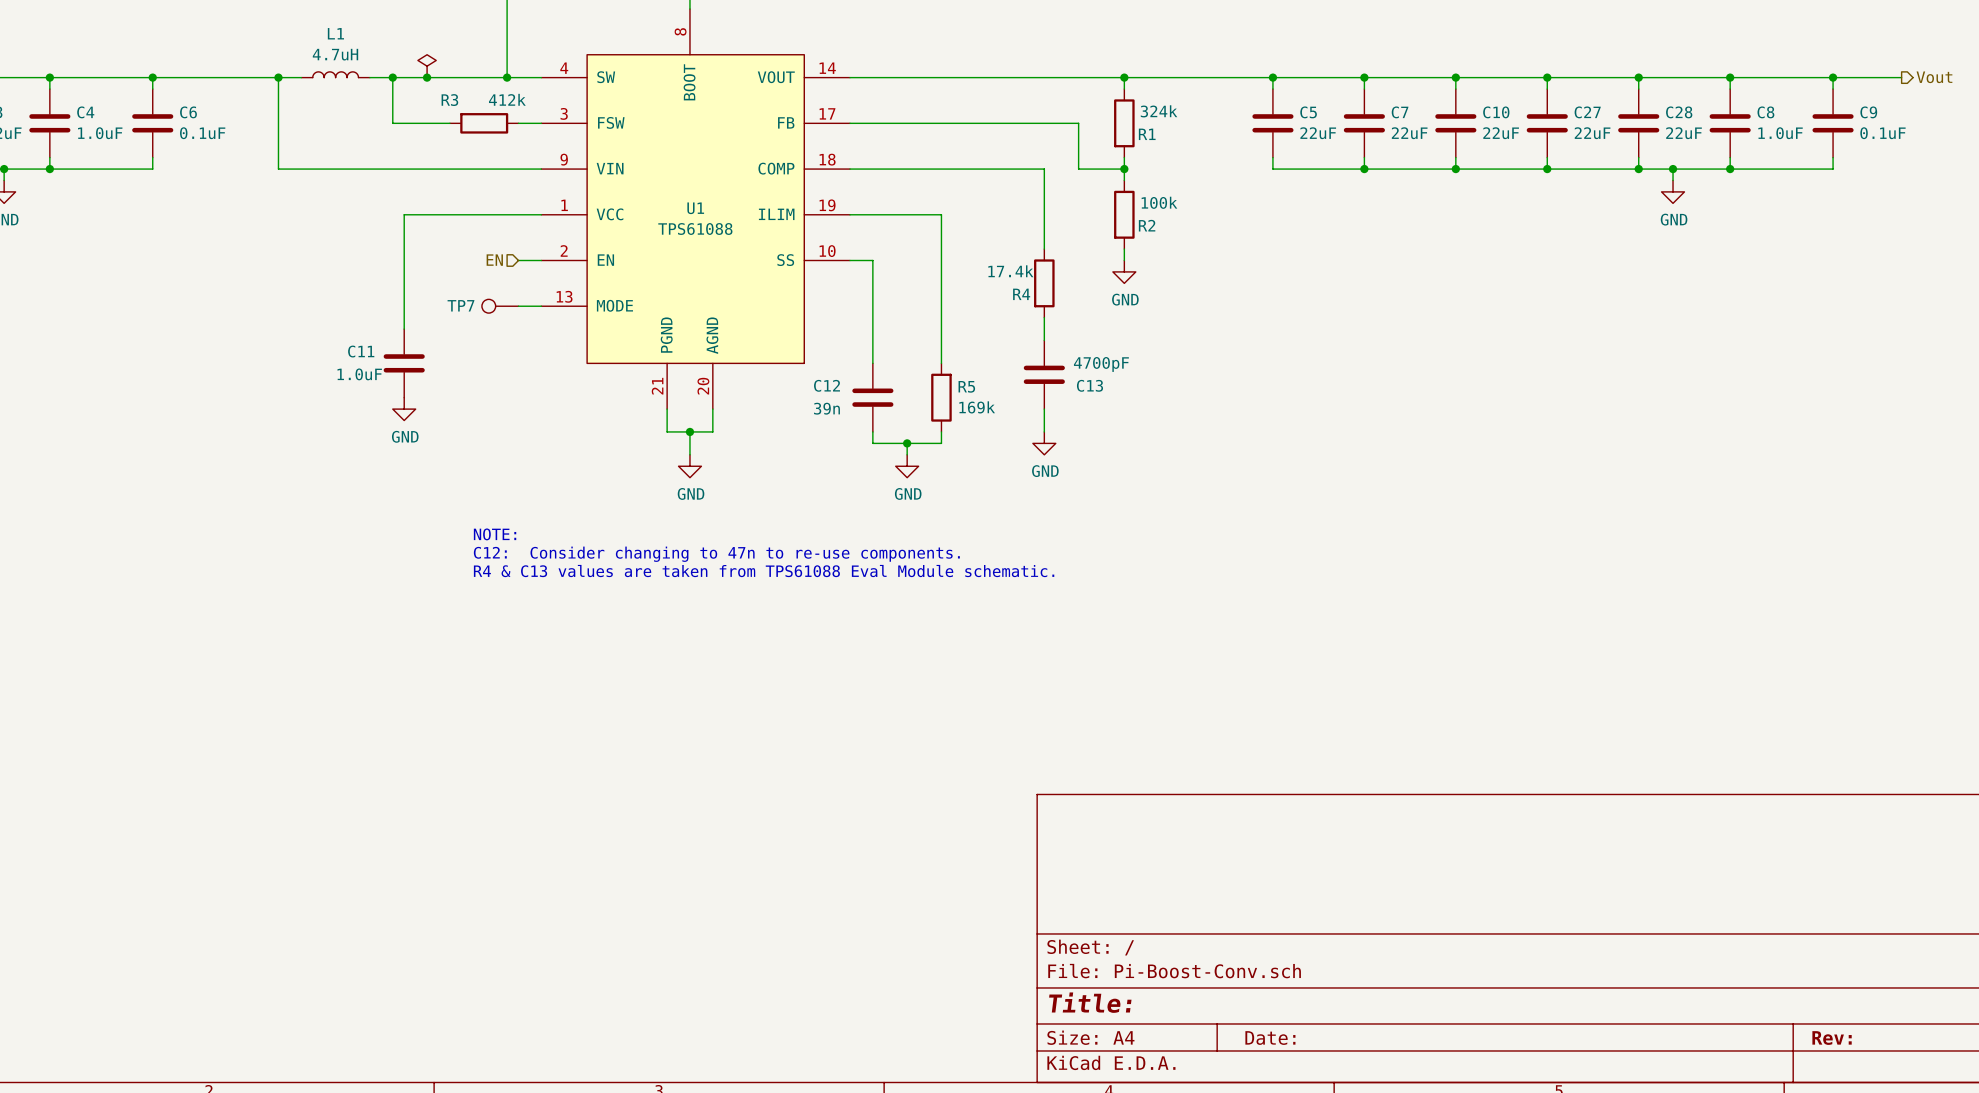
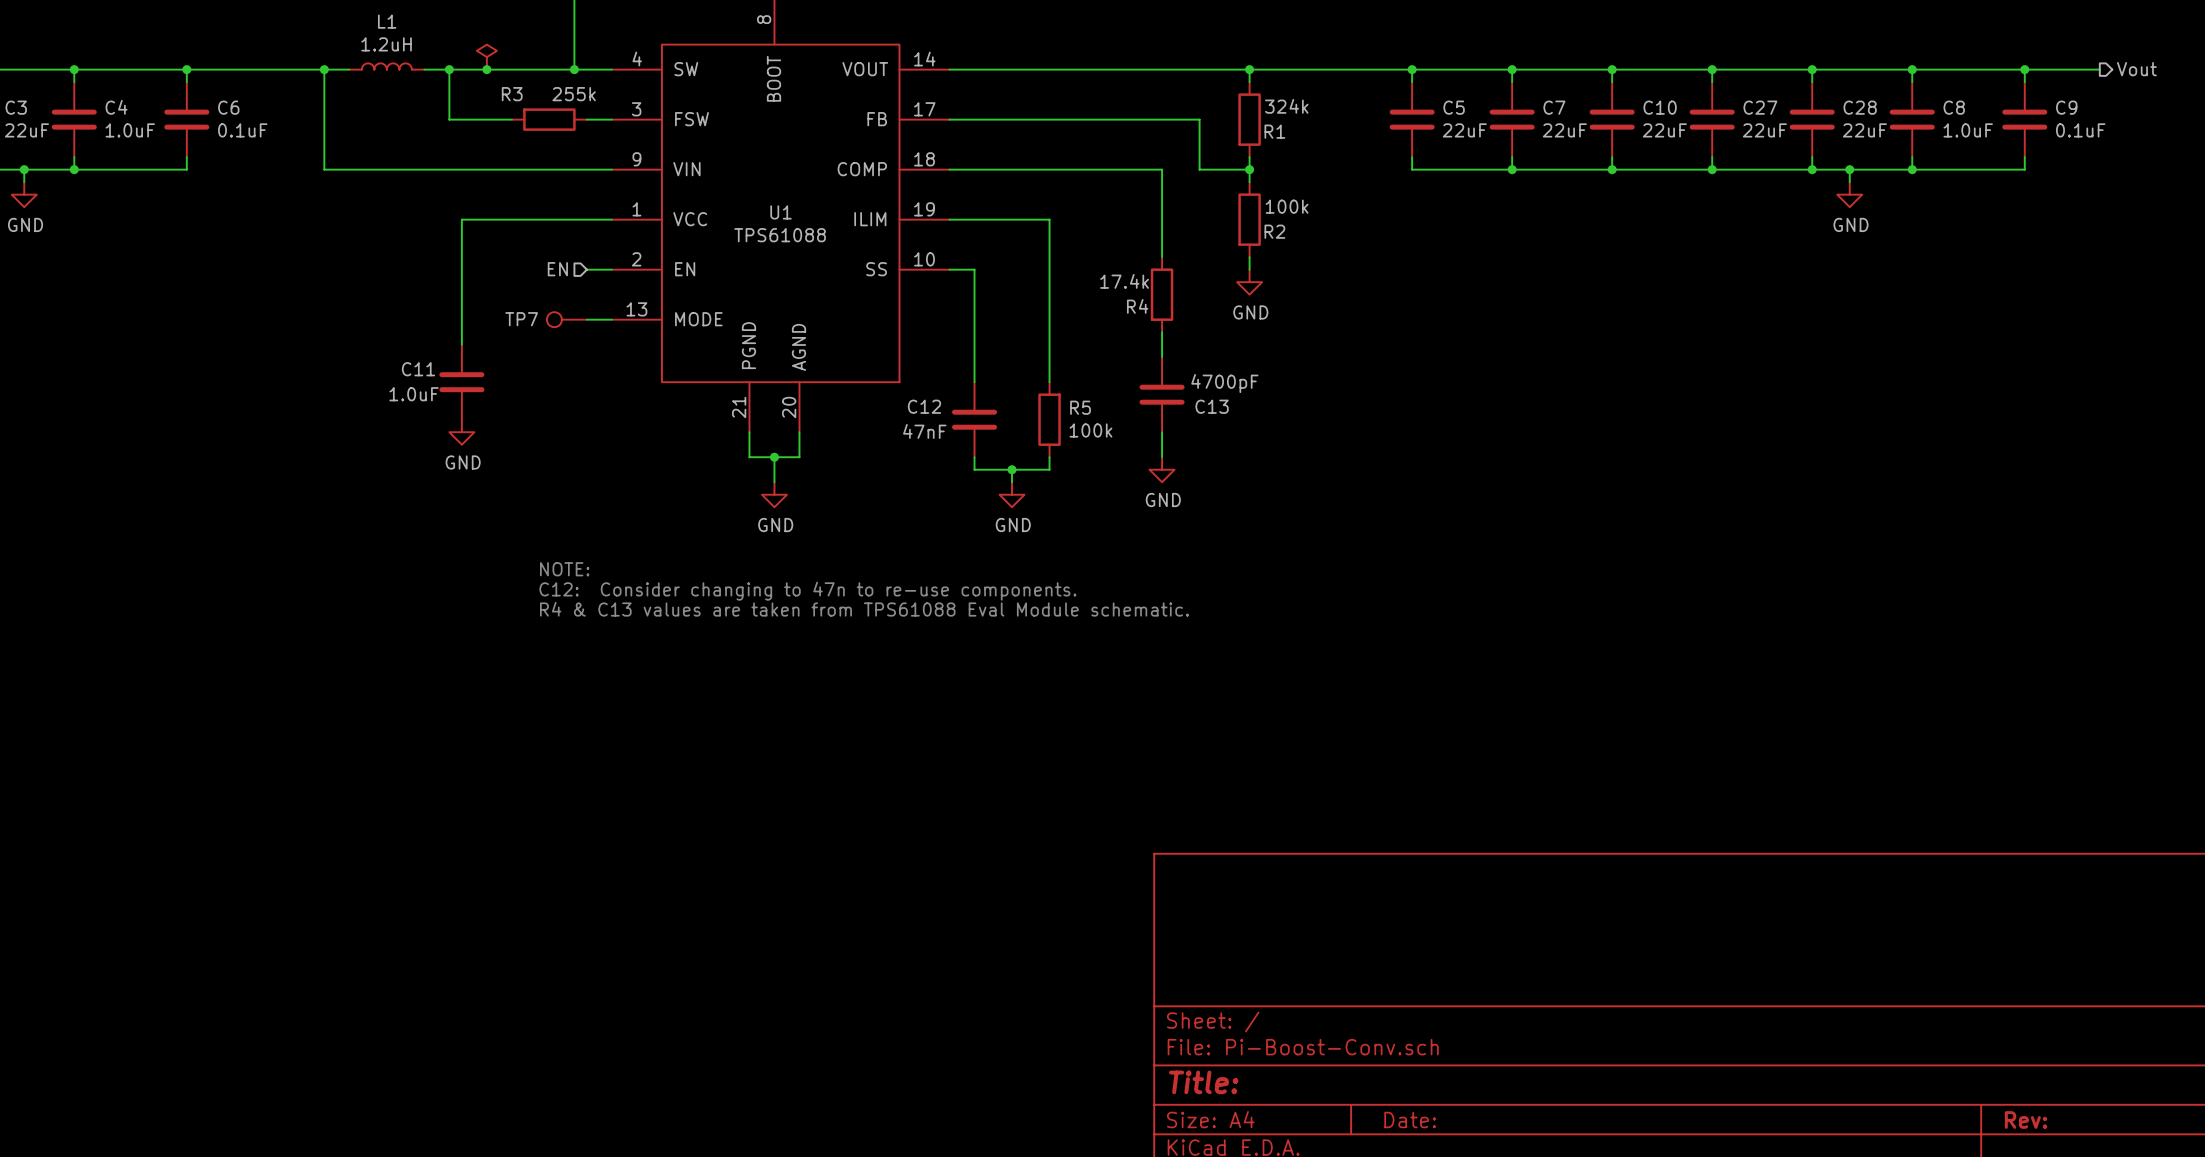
L1 value: 4.7uH (335, 54) -> 1.2uH (386, 44)
R3 value: 412k (507, 99) -> 255k (574, 94)
R5 value: 169k (977, 407) -> 100k (1090, 430)
C12 value: 39n (826, 408) -> 47nF (924, 431)

